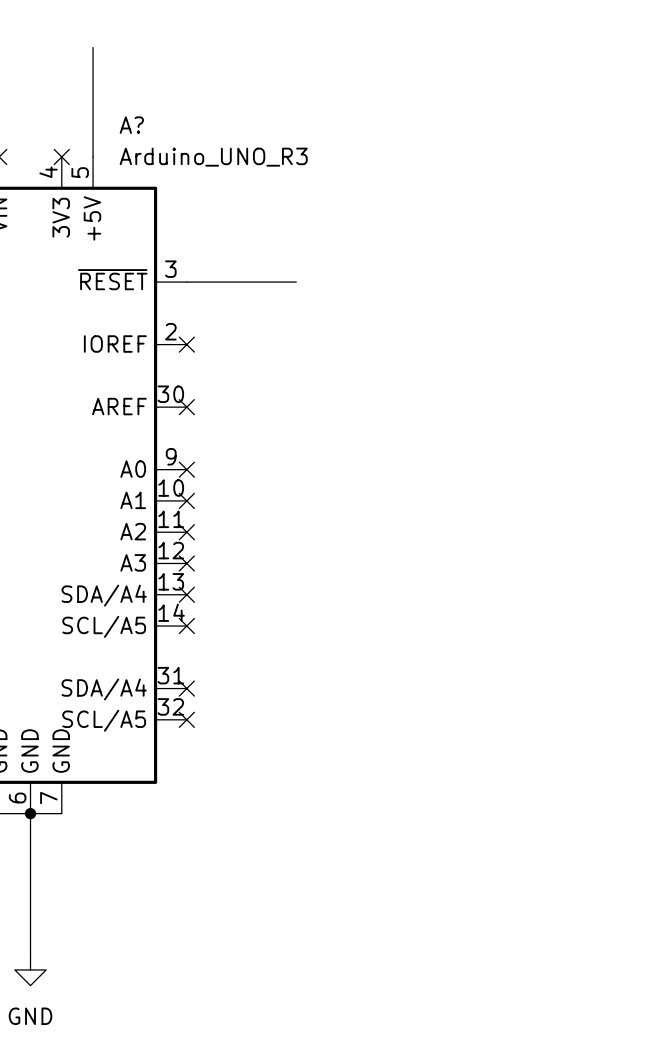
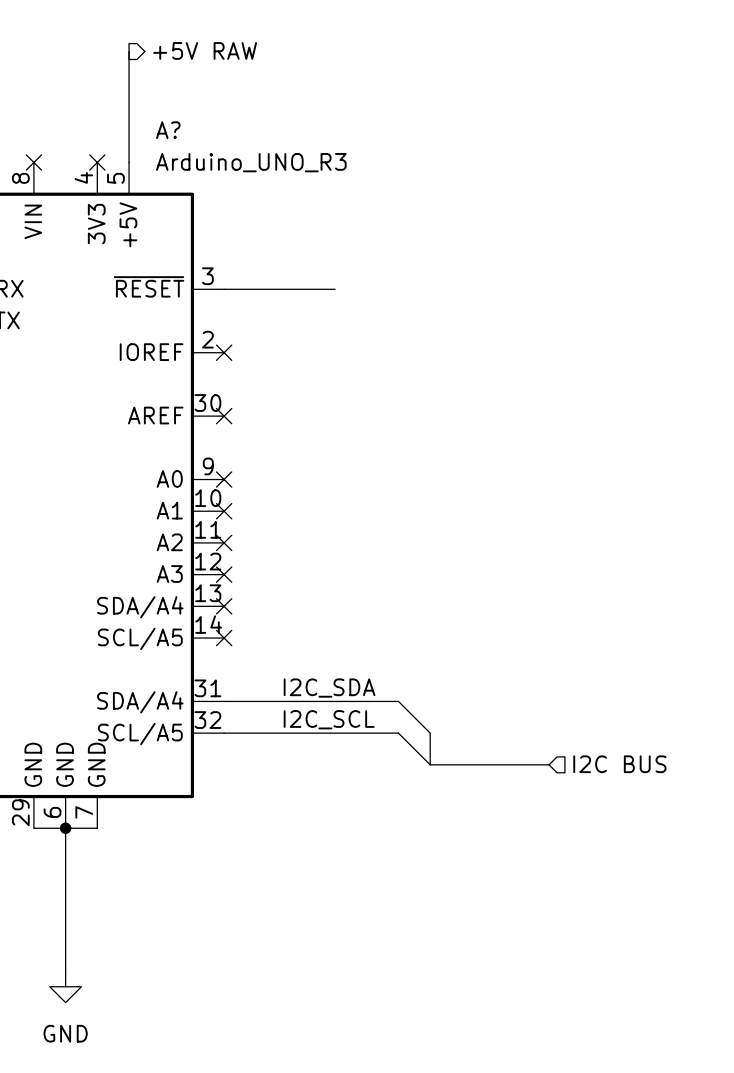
hierarchical label: none -> +5V RAW (205, 50)
label: none -> I2C_SDA (329, 688)
wire: none -> (224, 701) (398, 701) (430, 733)
no-connect mark: (186, 688) -> none
label: none -> I2C_SCL (329, 719)
wire: none -> (224, 733) (398, 733) (430, 764)
no-connect mark: (186, 719) -> none
bus: none -> (430, 733) (430, 764) (549, 764)
hierarchical label: none -> I2C BUS (619, 764)

